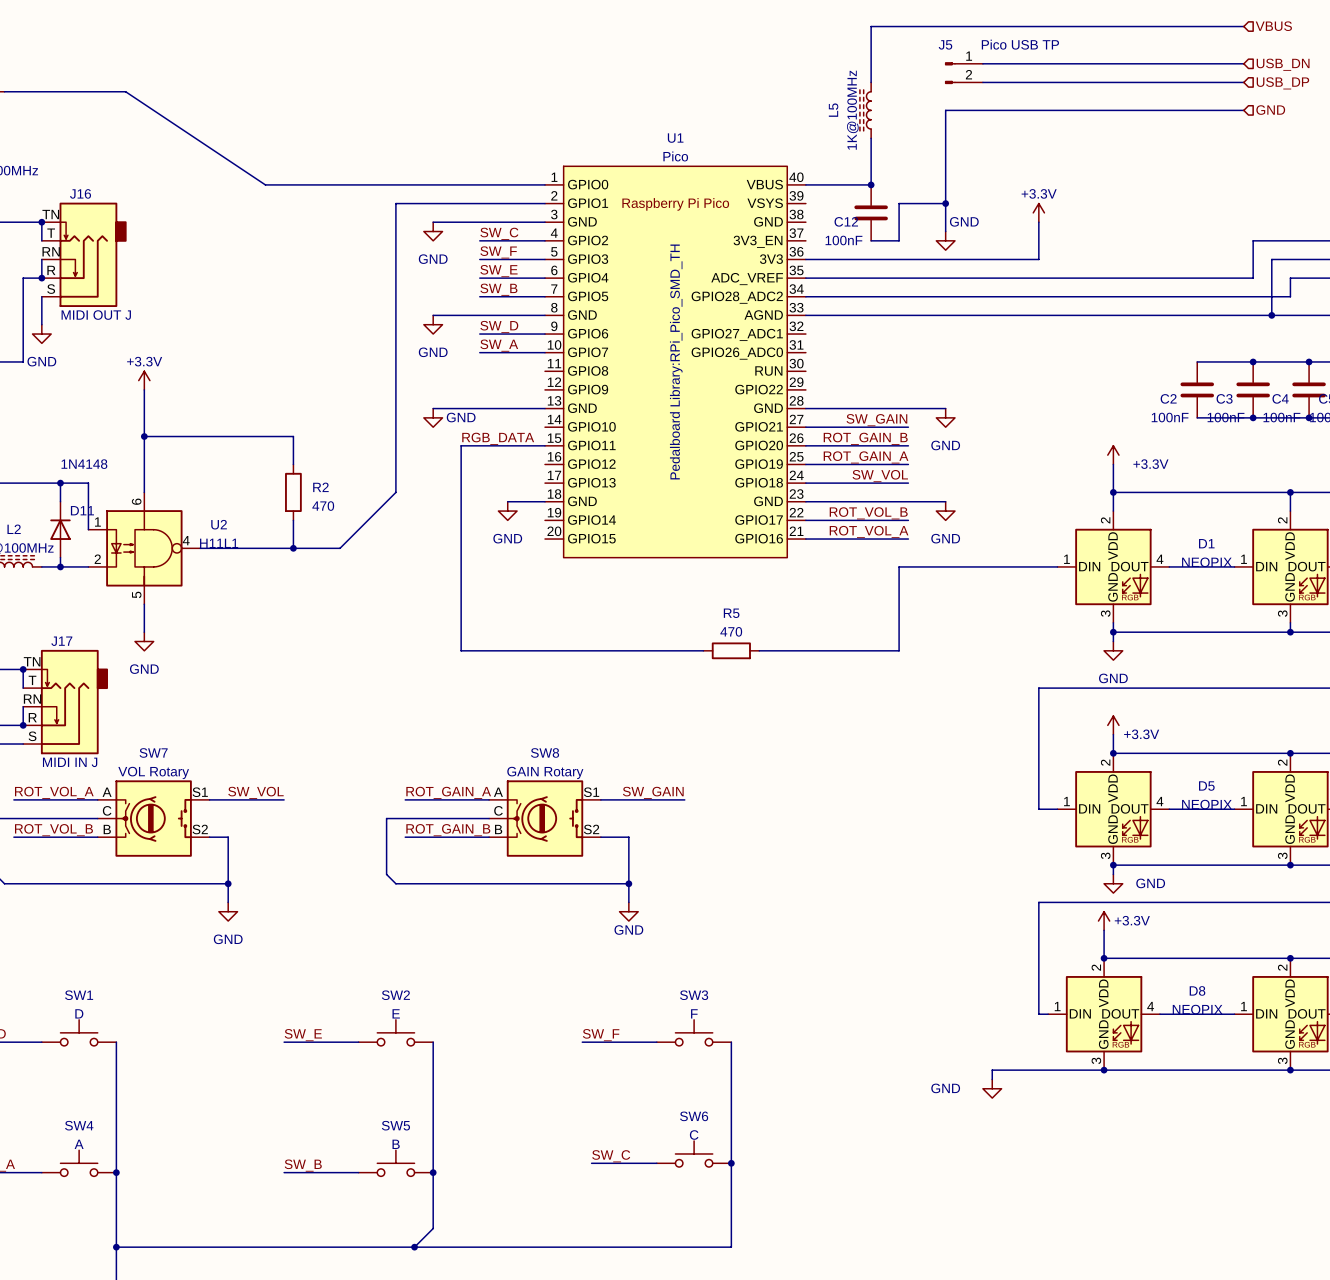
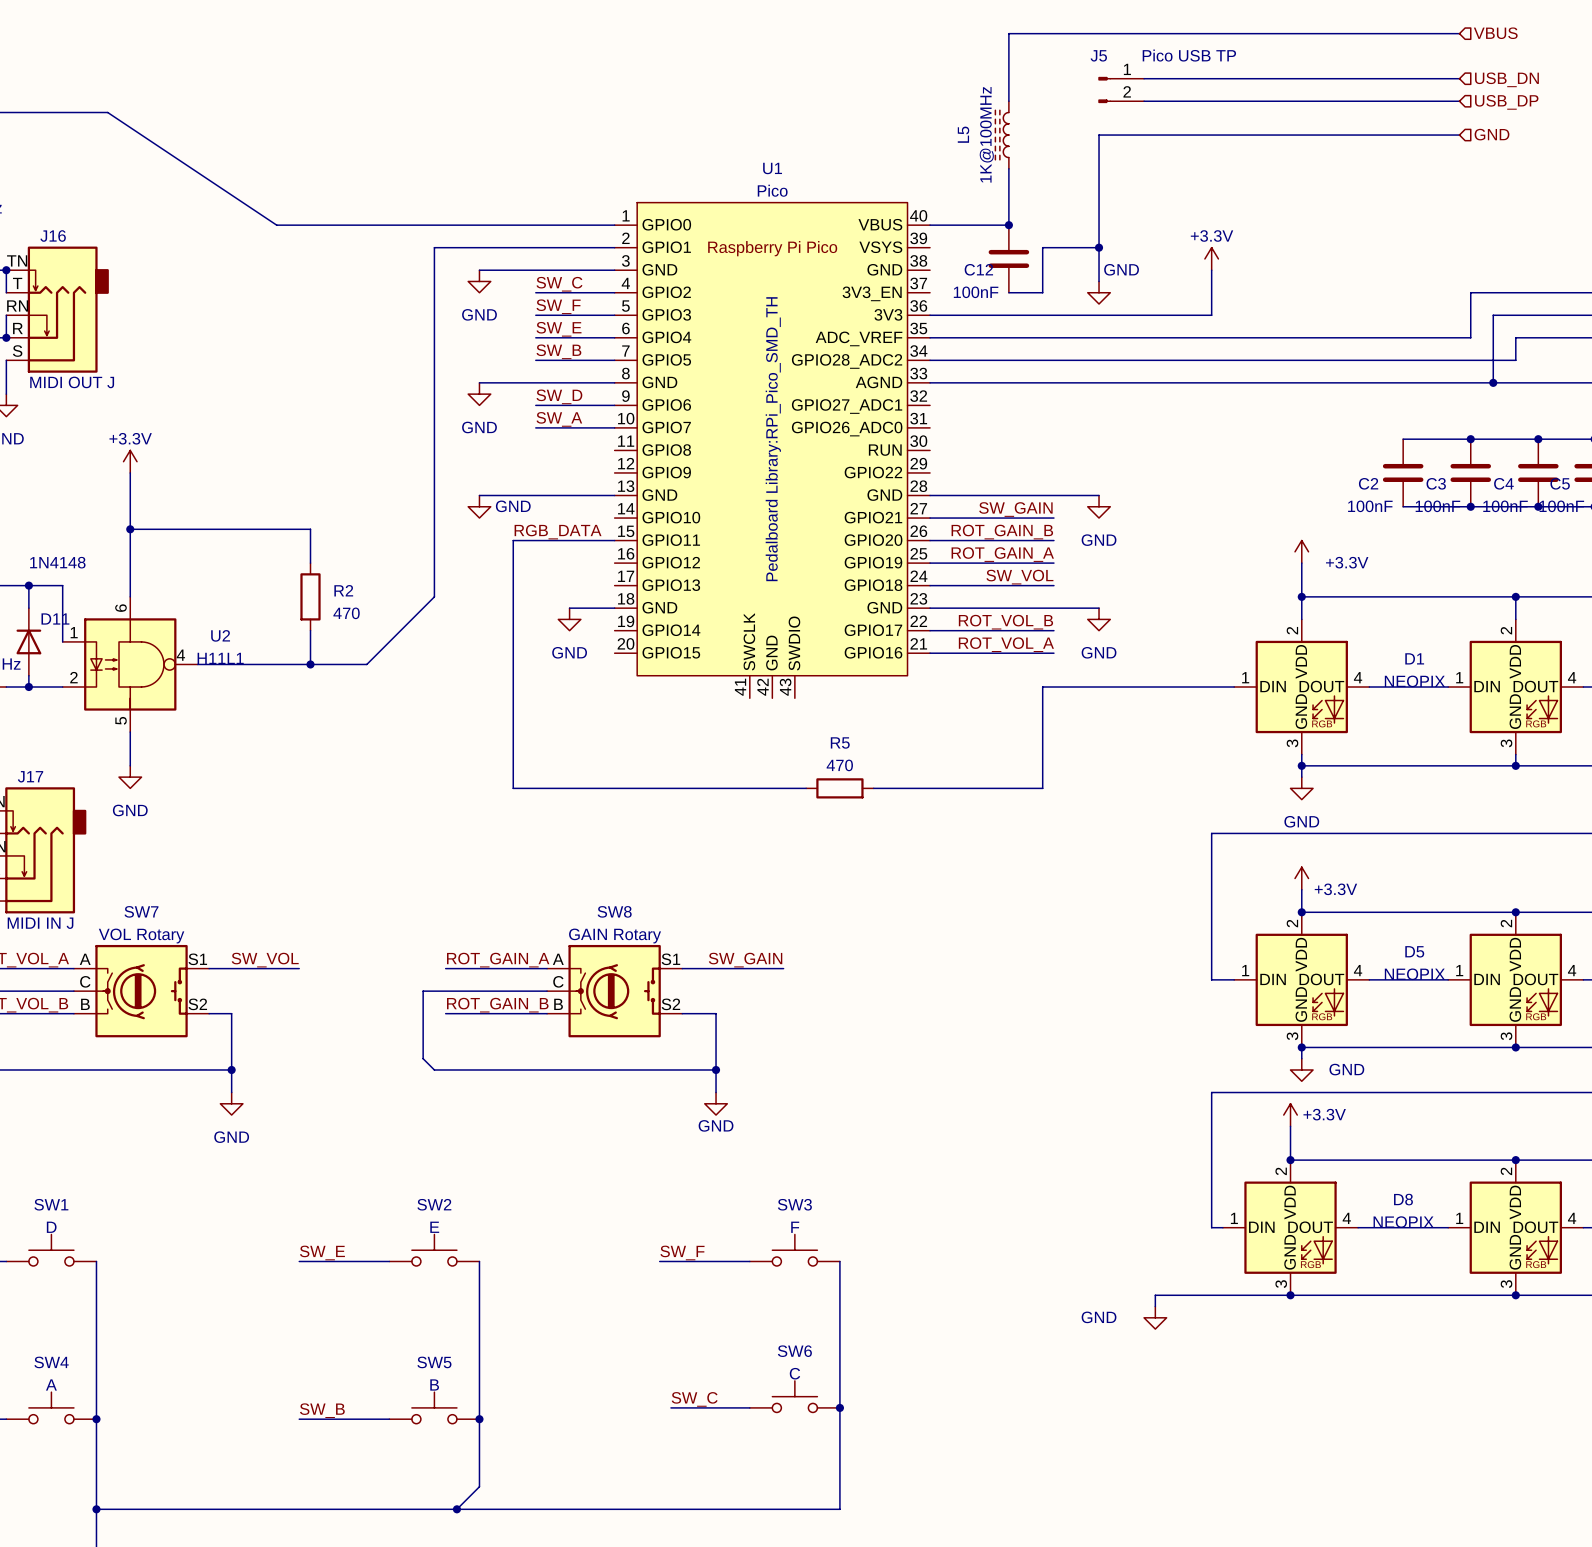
U1 symbol: [545, 166, 806, 558] -> [614, 202, 931, 699]

